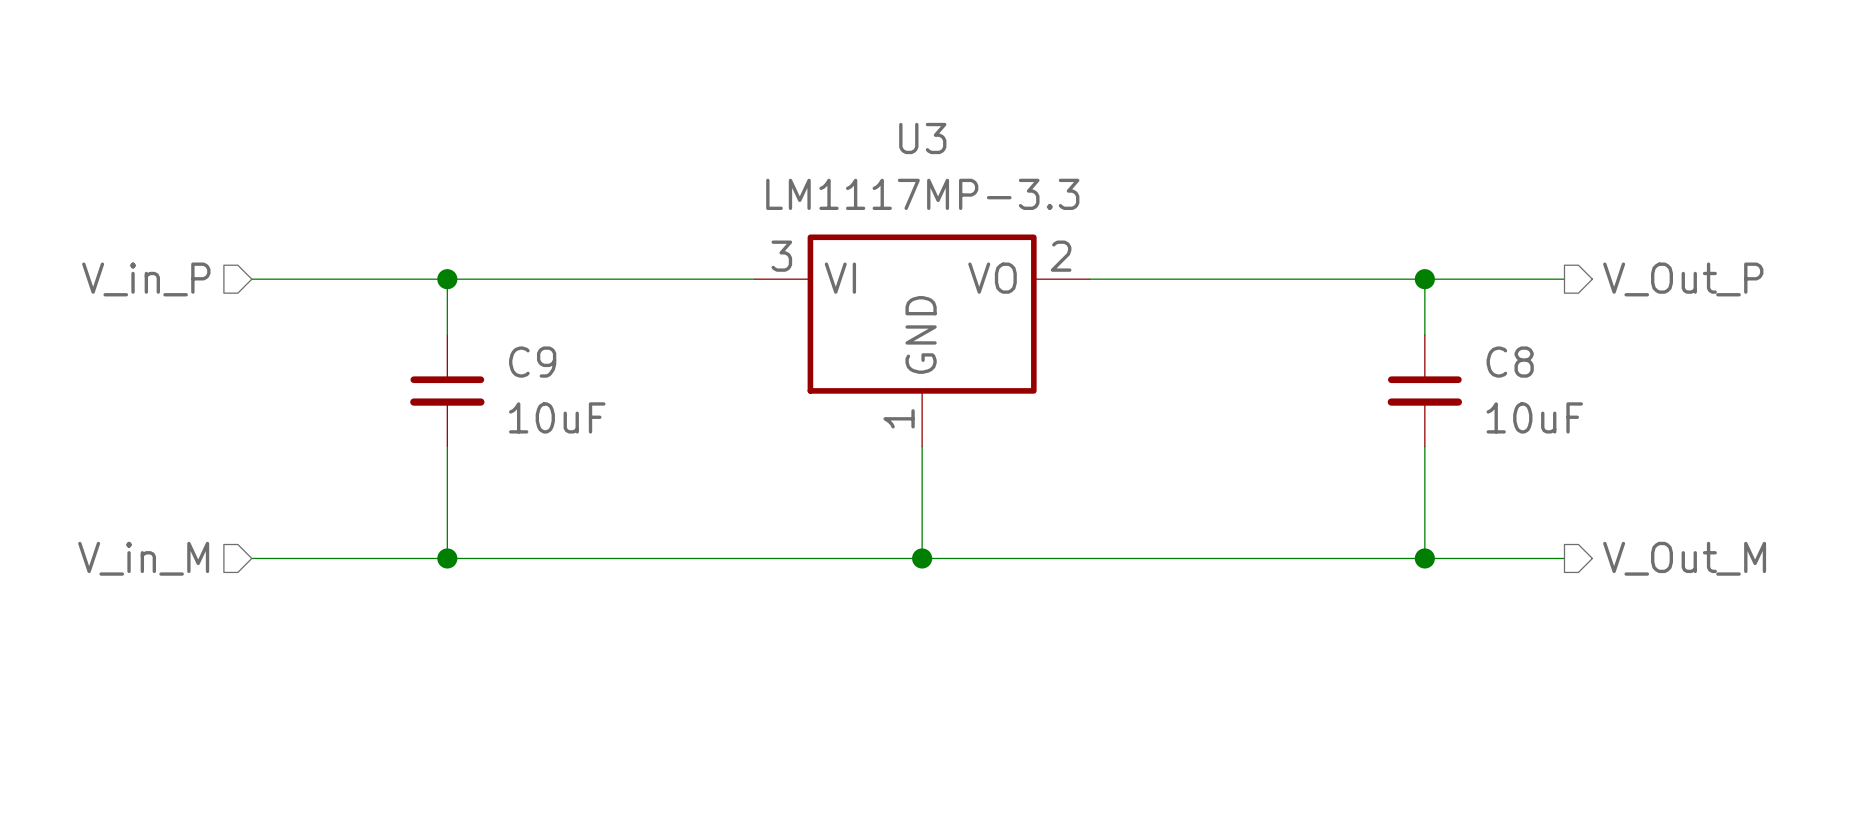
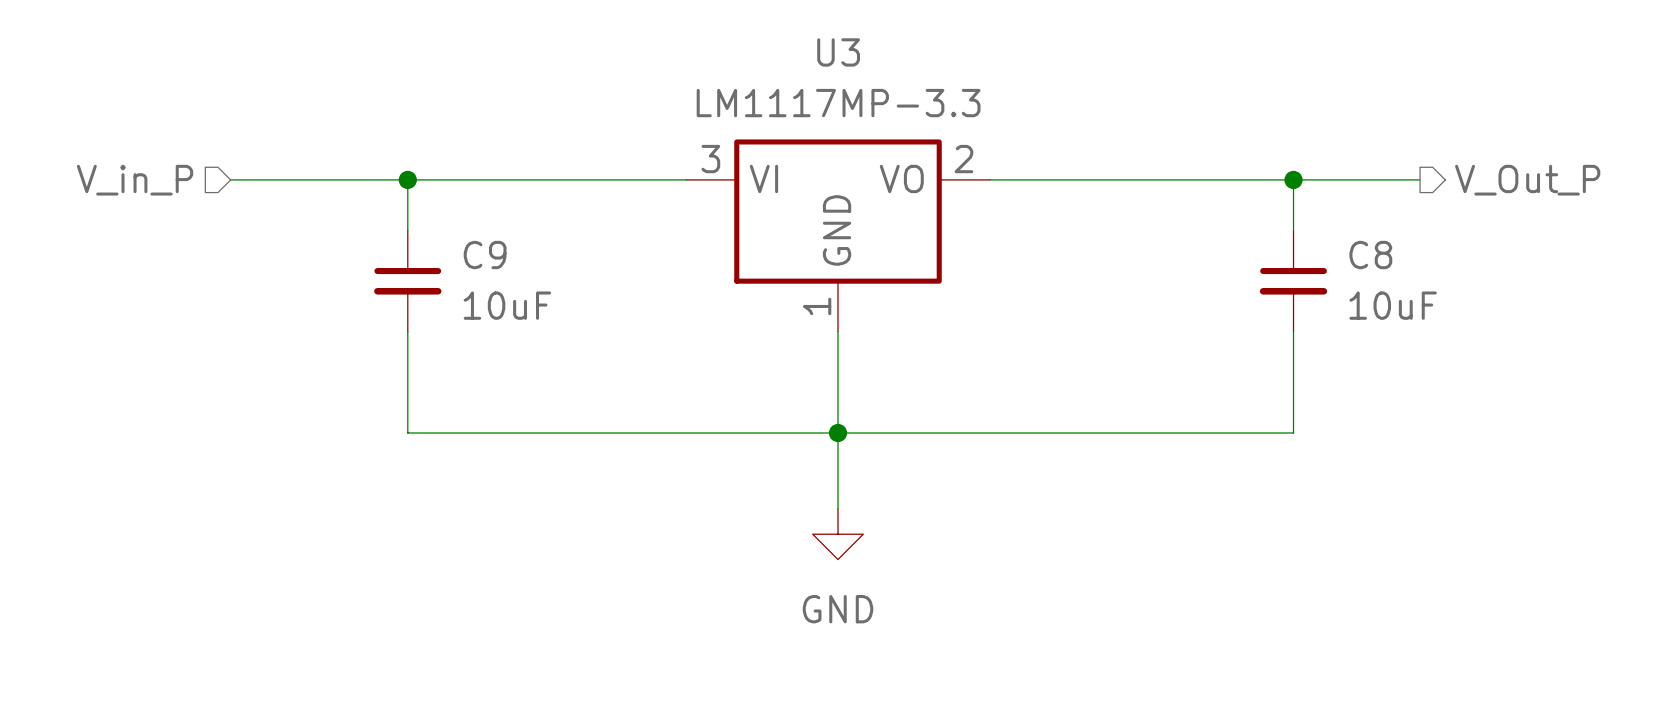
hierarchical label: V_in_M (143, 558) -> none
wire: (251, 558) (447, 558) -> none
junction: (447, 558) -> none
wire: none -> (838, 432) (838, 508)
wire: (1424, 558) (1564, 558) -> none
junction: (1424, 558) -> none
hierarchical label: V_Out_M (1684, 558) -> none
power symbol: none -> GND (838, 534)

